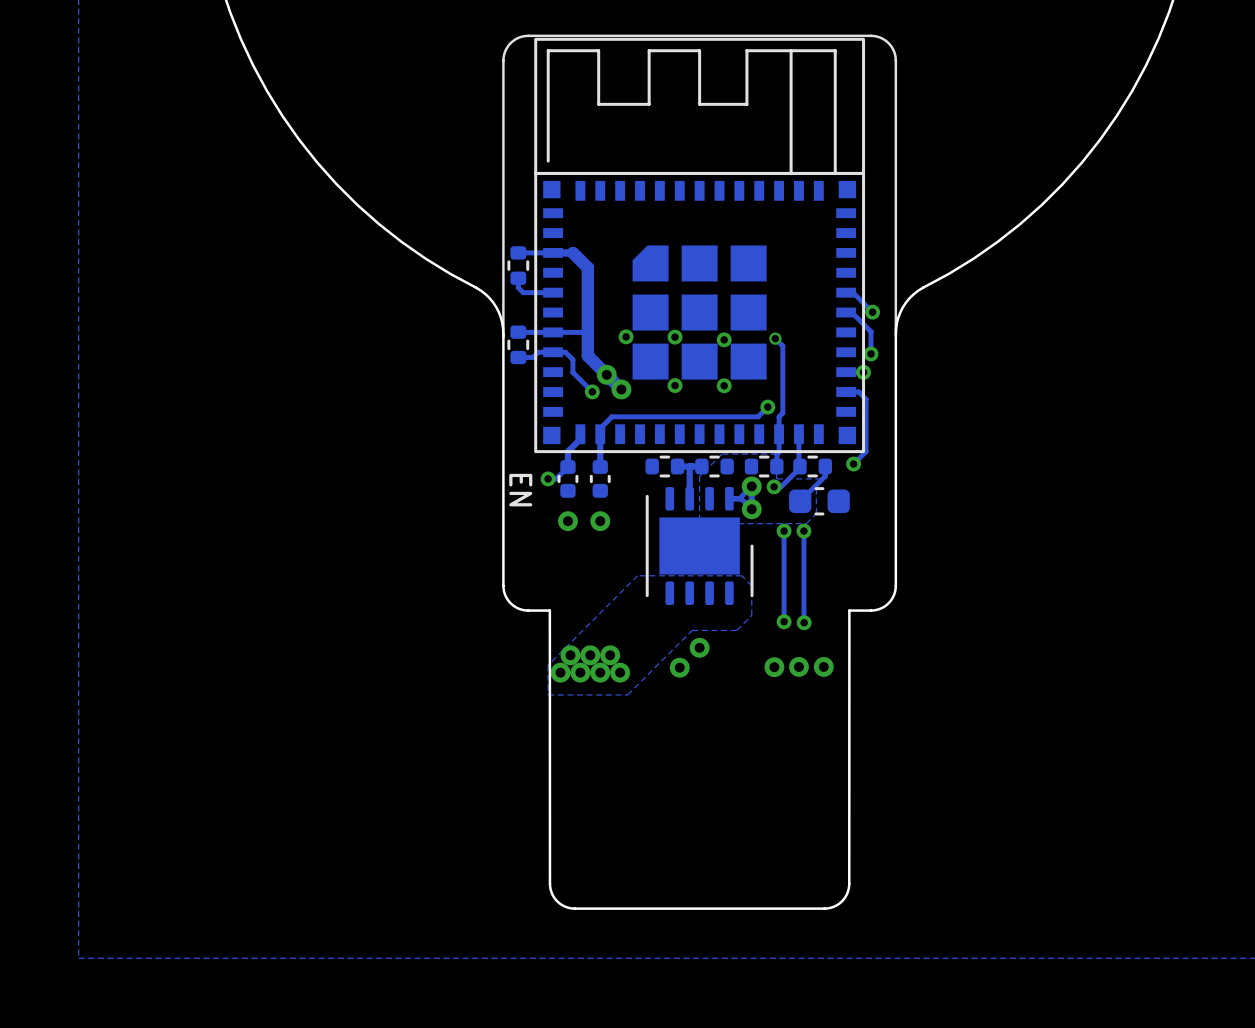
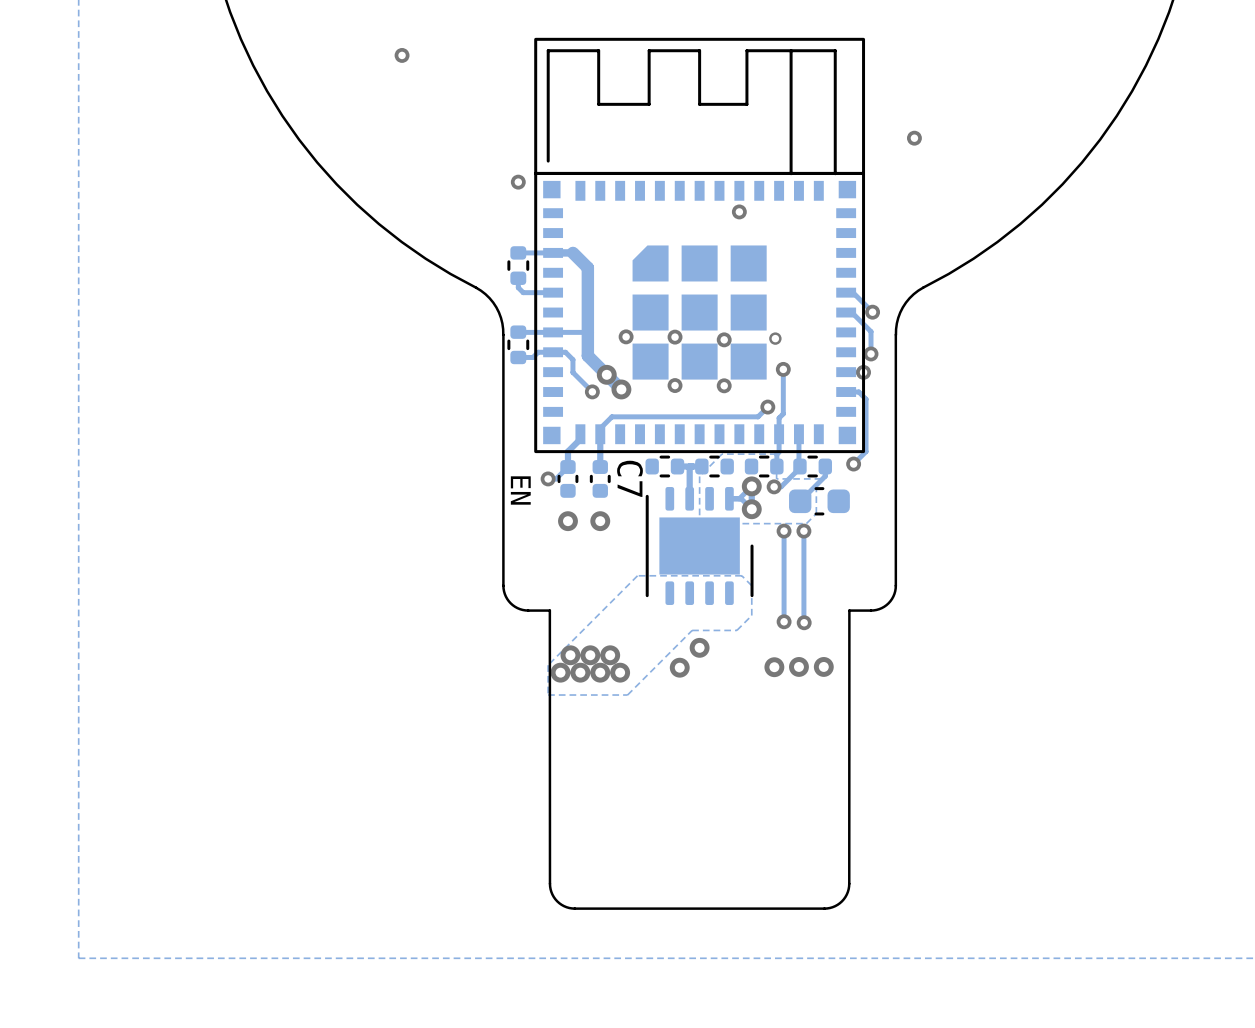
via: none -> (402, 55)
via: none -> (914, 138)
via: none -> (518, 182)
via: none -> (739, 211)
line: (895, 334) (895, 60) (893, 49) (886, 41) (870, 35) (528, 35) (520, 37) (510, 43) (503, 57) (503, 337) -> none
track: (775, 338) (782, 346) (782, 413) (779, 418) -> (783, 369) (783, 413) (779, 418)
via: none -> (783, 369)
C7 name: none -> C7 (629, 478)

